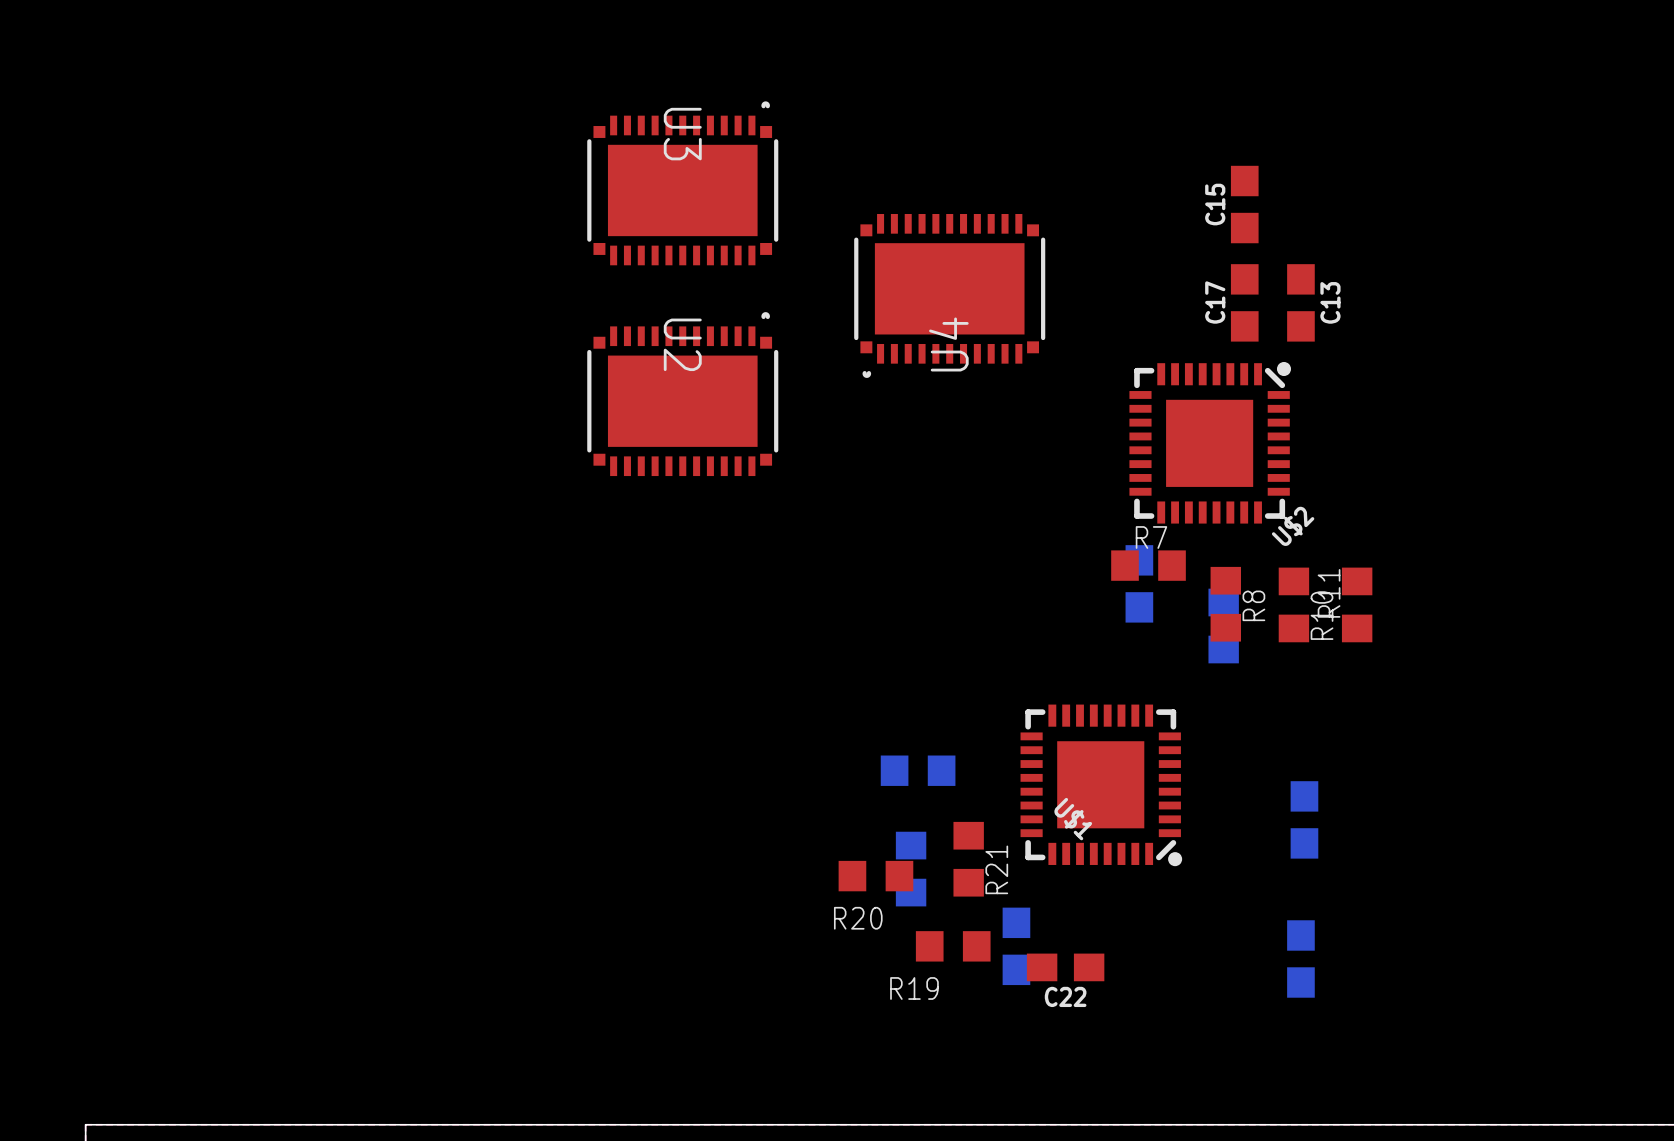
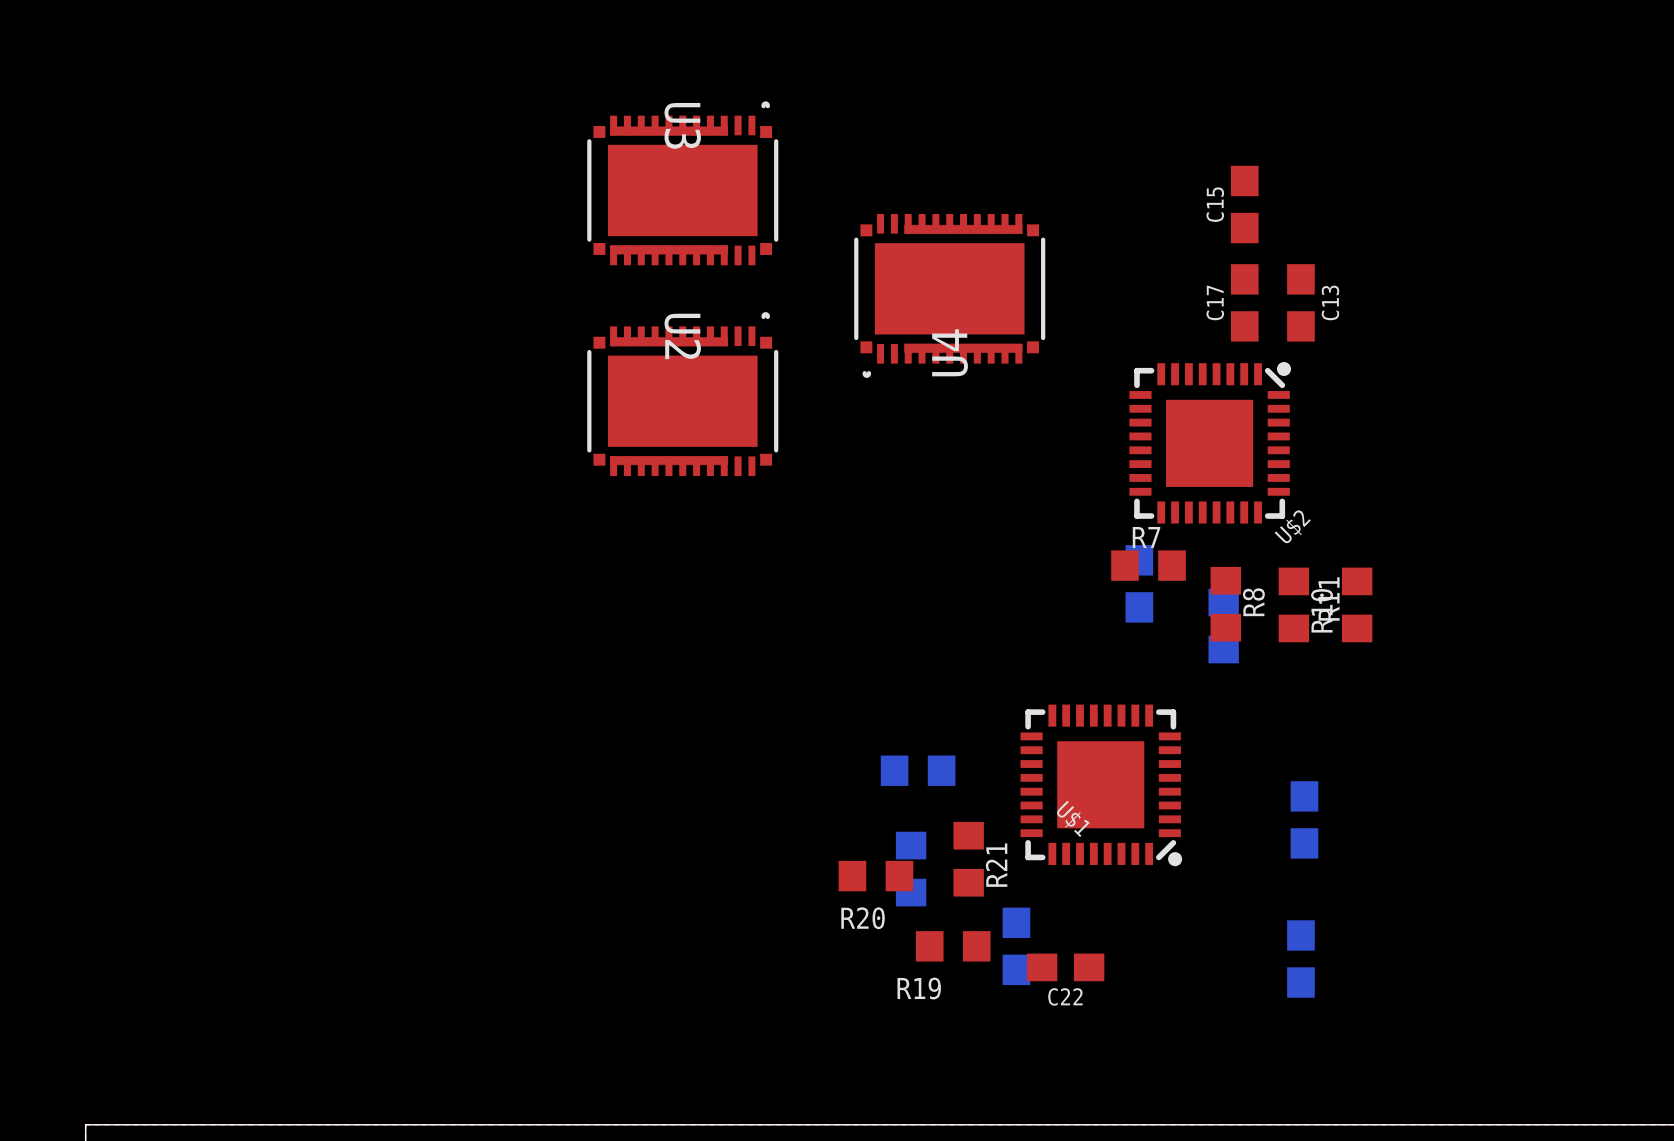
U3 footprint: [587, 101, 779, 266] -> [587, 101, 779, 266]
U4 footprint: [854, 214, 1046, 378] -> [854, 214, 1046, 378]
U2 footprint: [587, 312, 779, 477] -> [587, 312, 779, 477]

